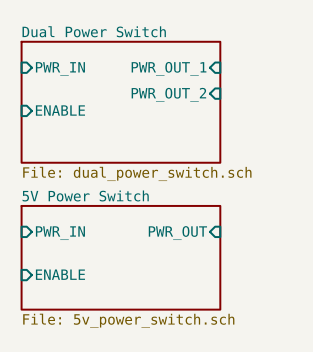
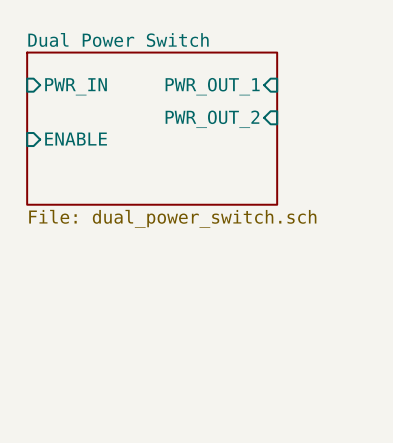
sheet pin: PWR_IN (60, 233) -> none
sheet pin: PWR_OUT (177, 233) -> none
sheet 5V Power Switch: File: 5v_power_switch.sch (120, 257) -> none
sheet pin: ENABLE (60, 274) -> none

